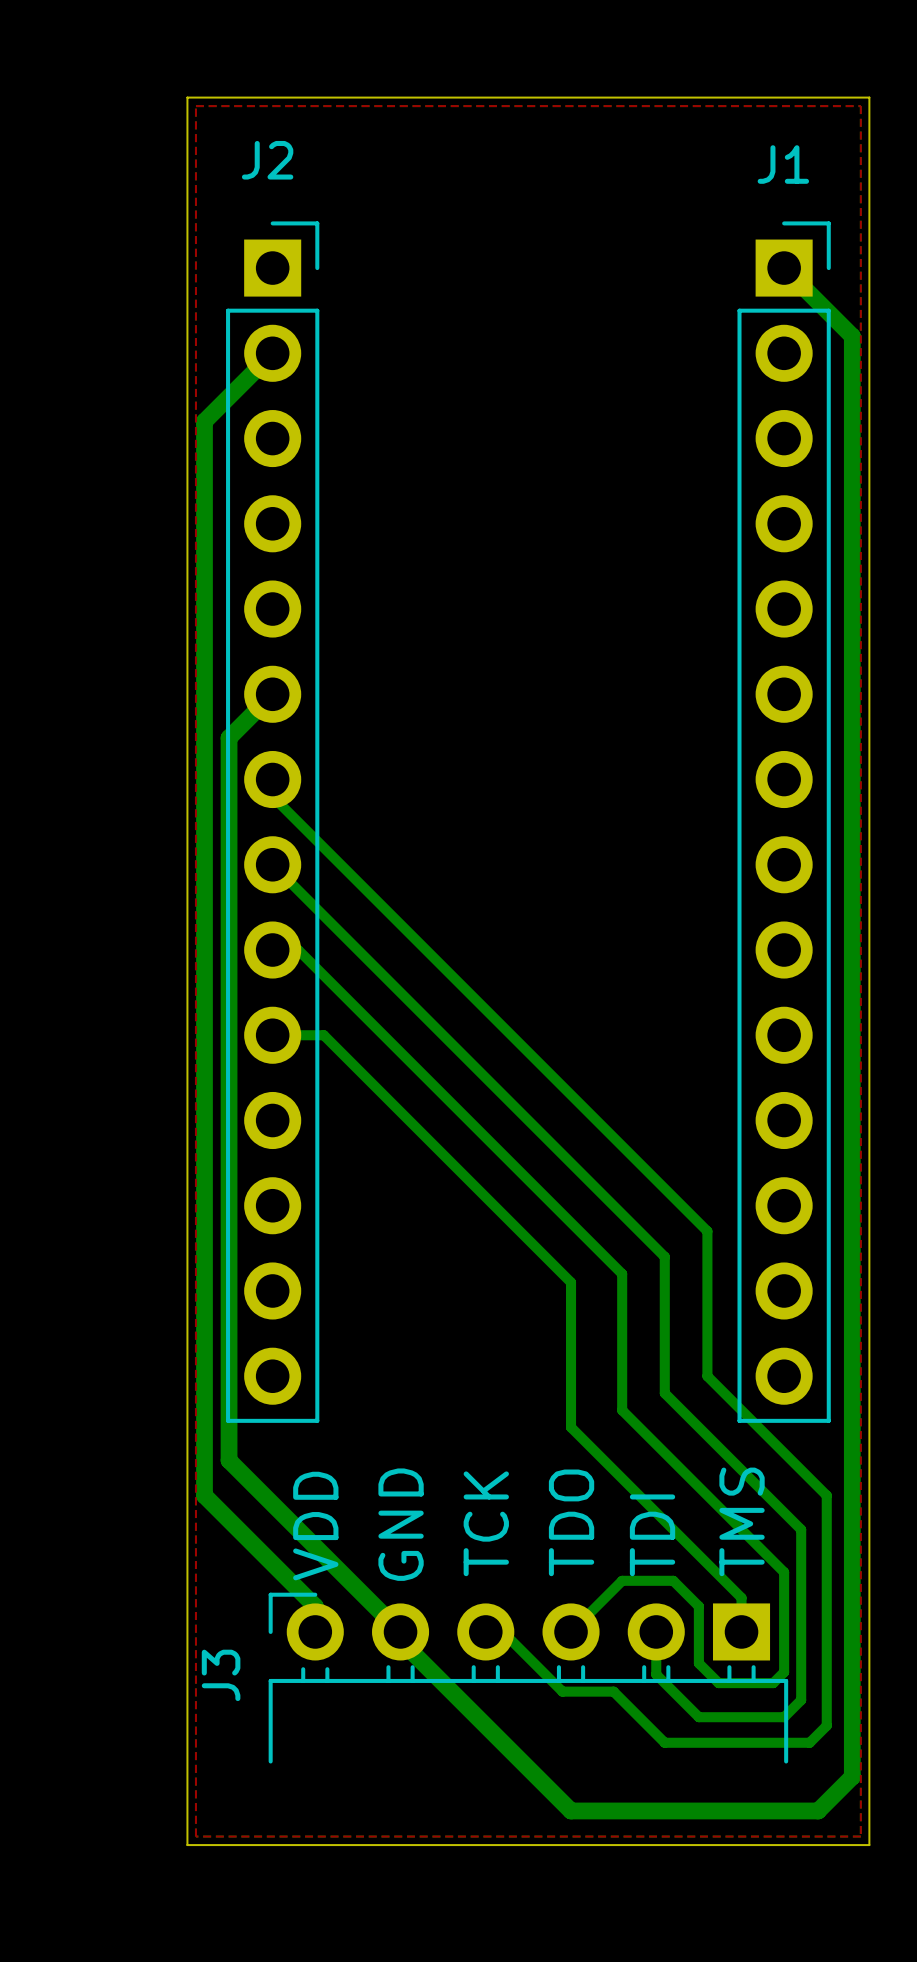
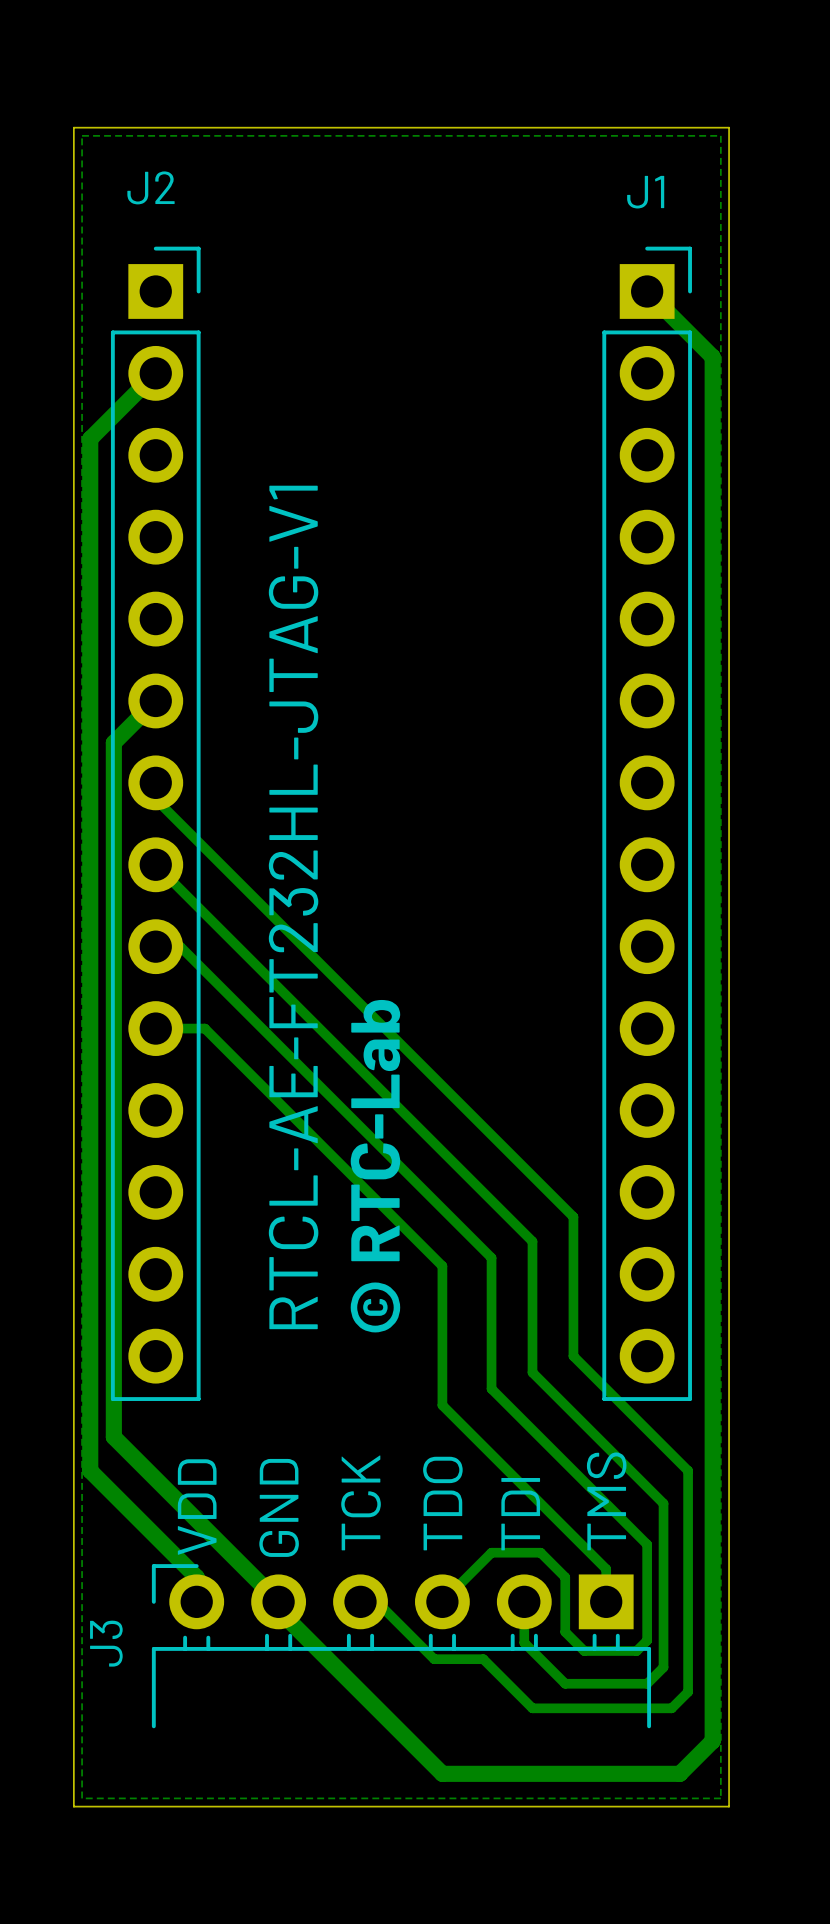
top zone outline: (195, 106) (860, 106) (860, 1836) (195, 1836) (195, 106) -> none
text: none -> RTCL-AE-FT232HL-JTAG-V1 (293, 907)
text: none -> © RTC-Lab (375, 1166)

